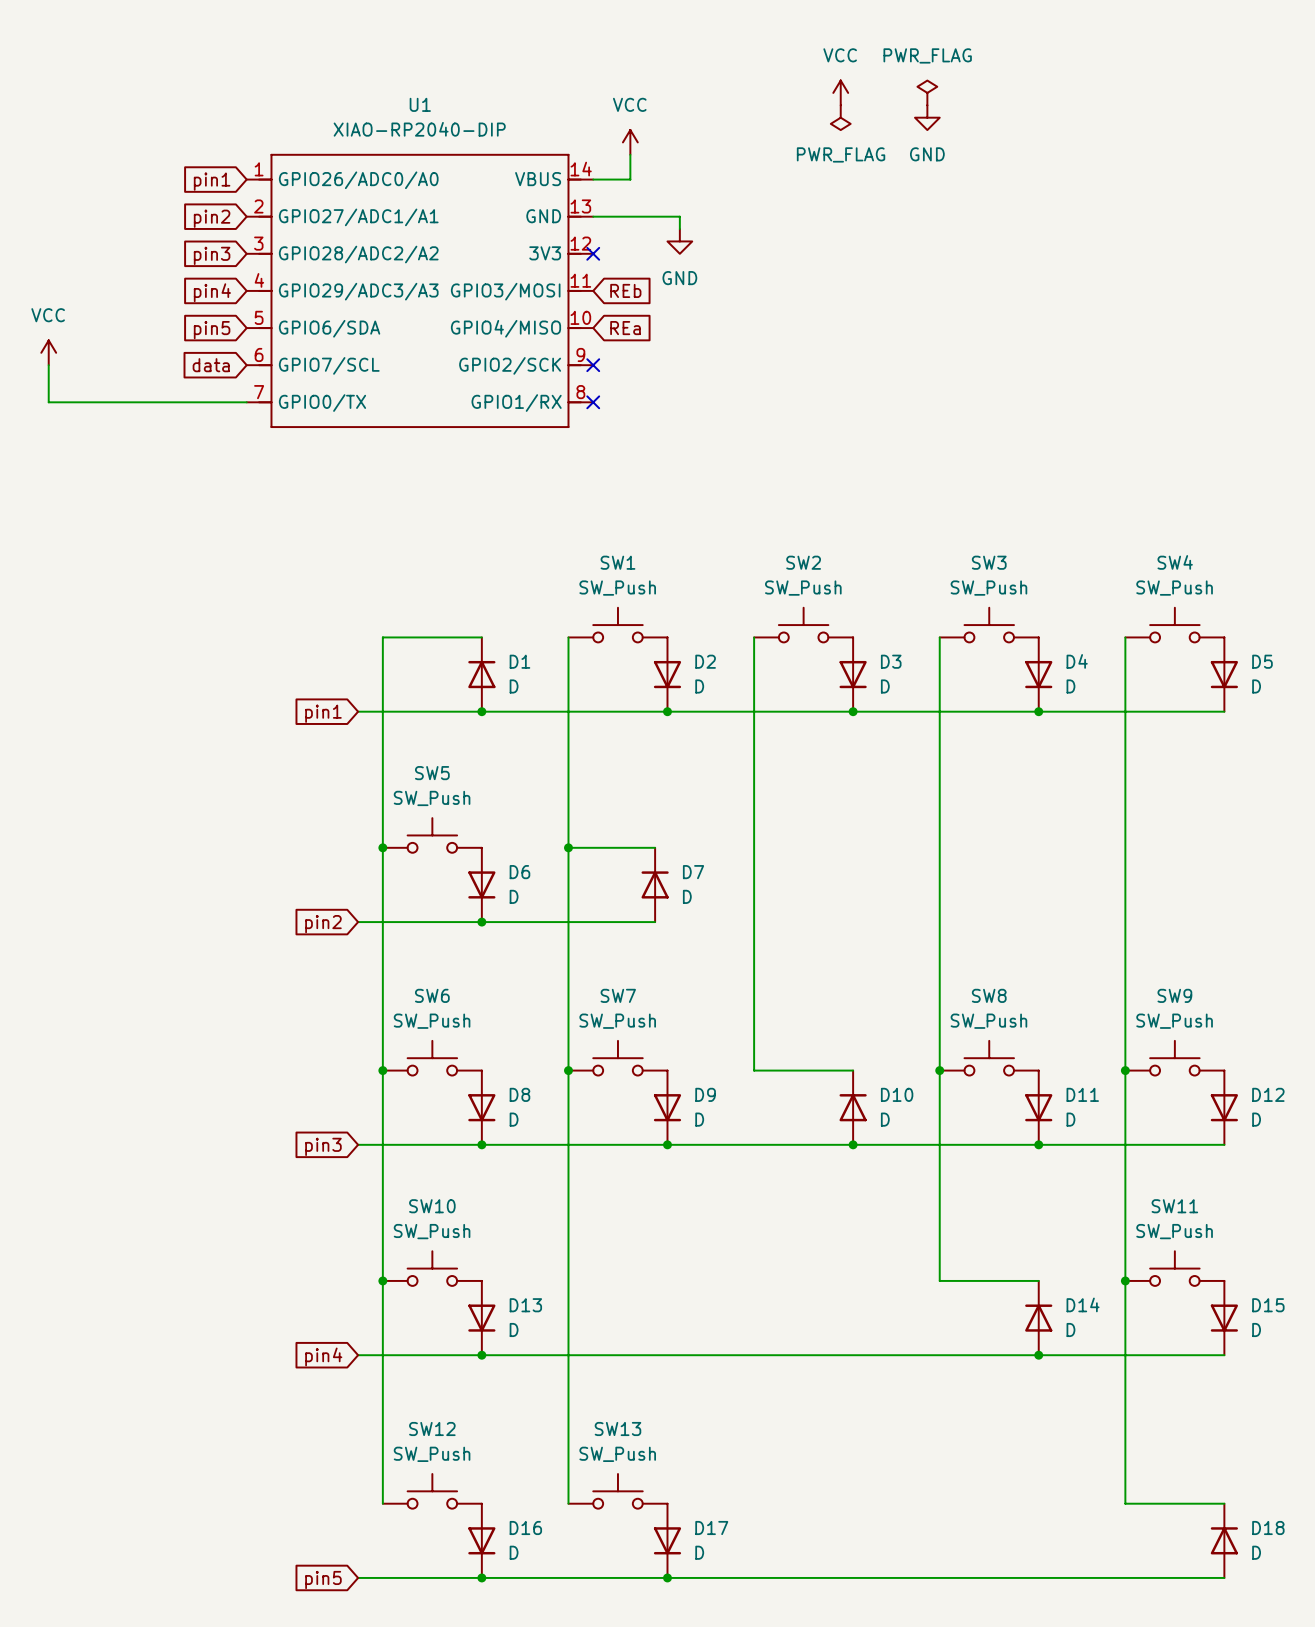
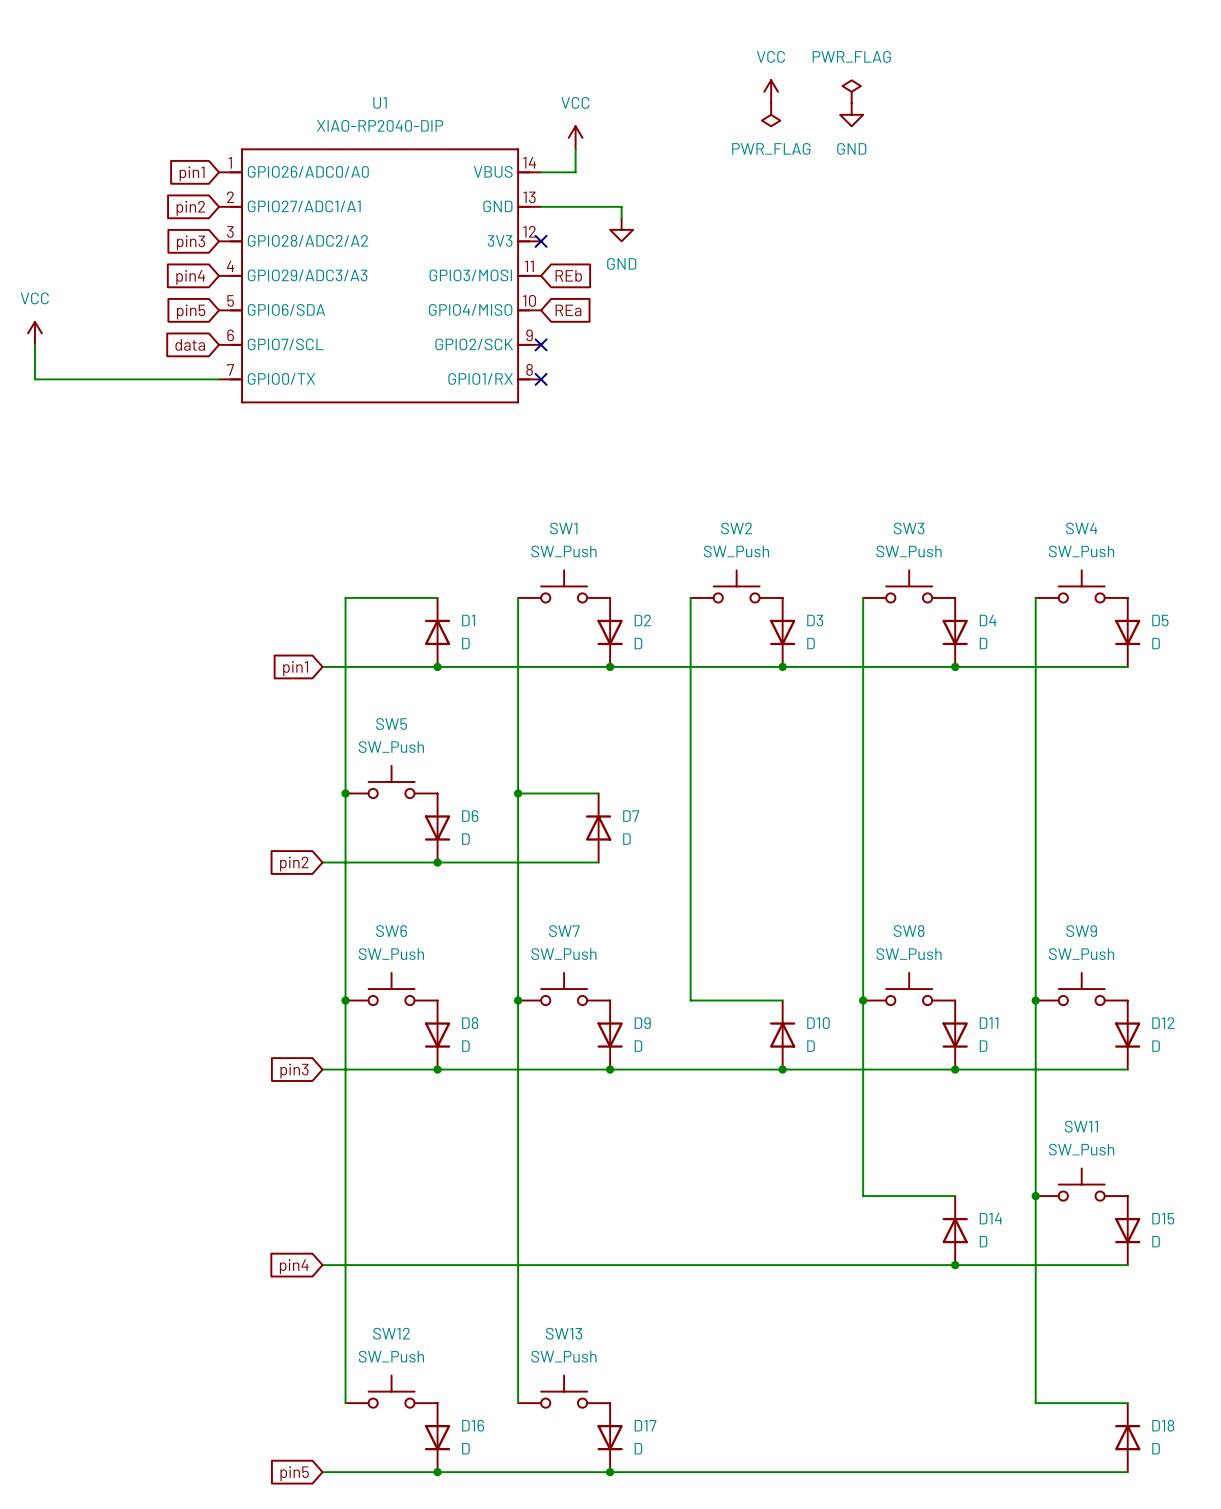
SW10: SW_Push (432, 1268) -> none
junction: (382, 1280) -> none
D13: D (481, 1318) -> none
junction: (481, 1355) -> none

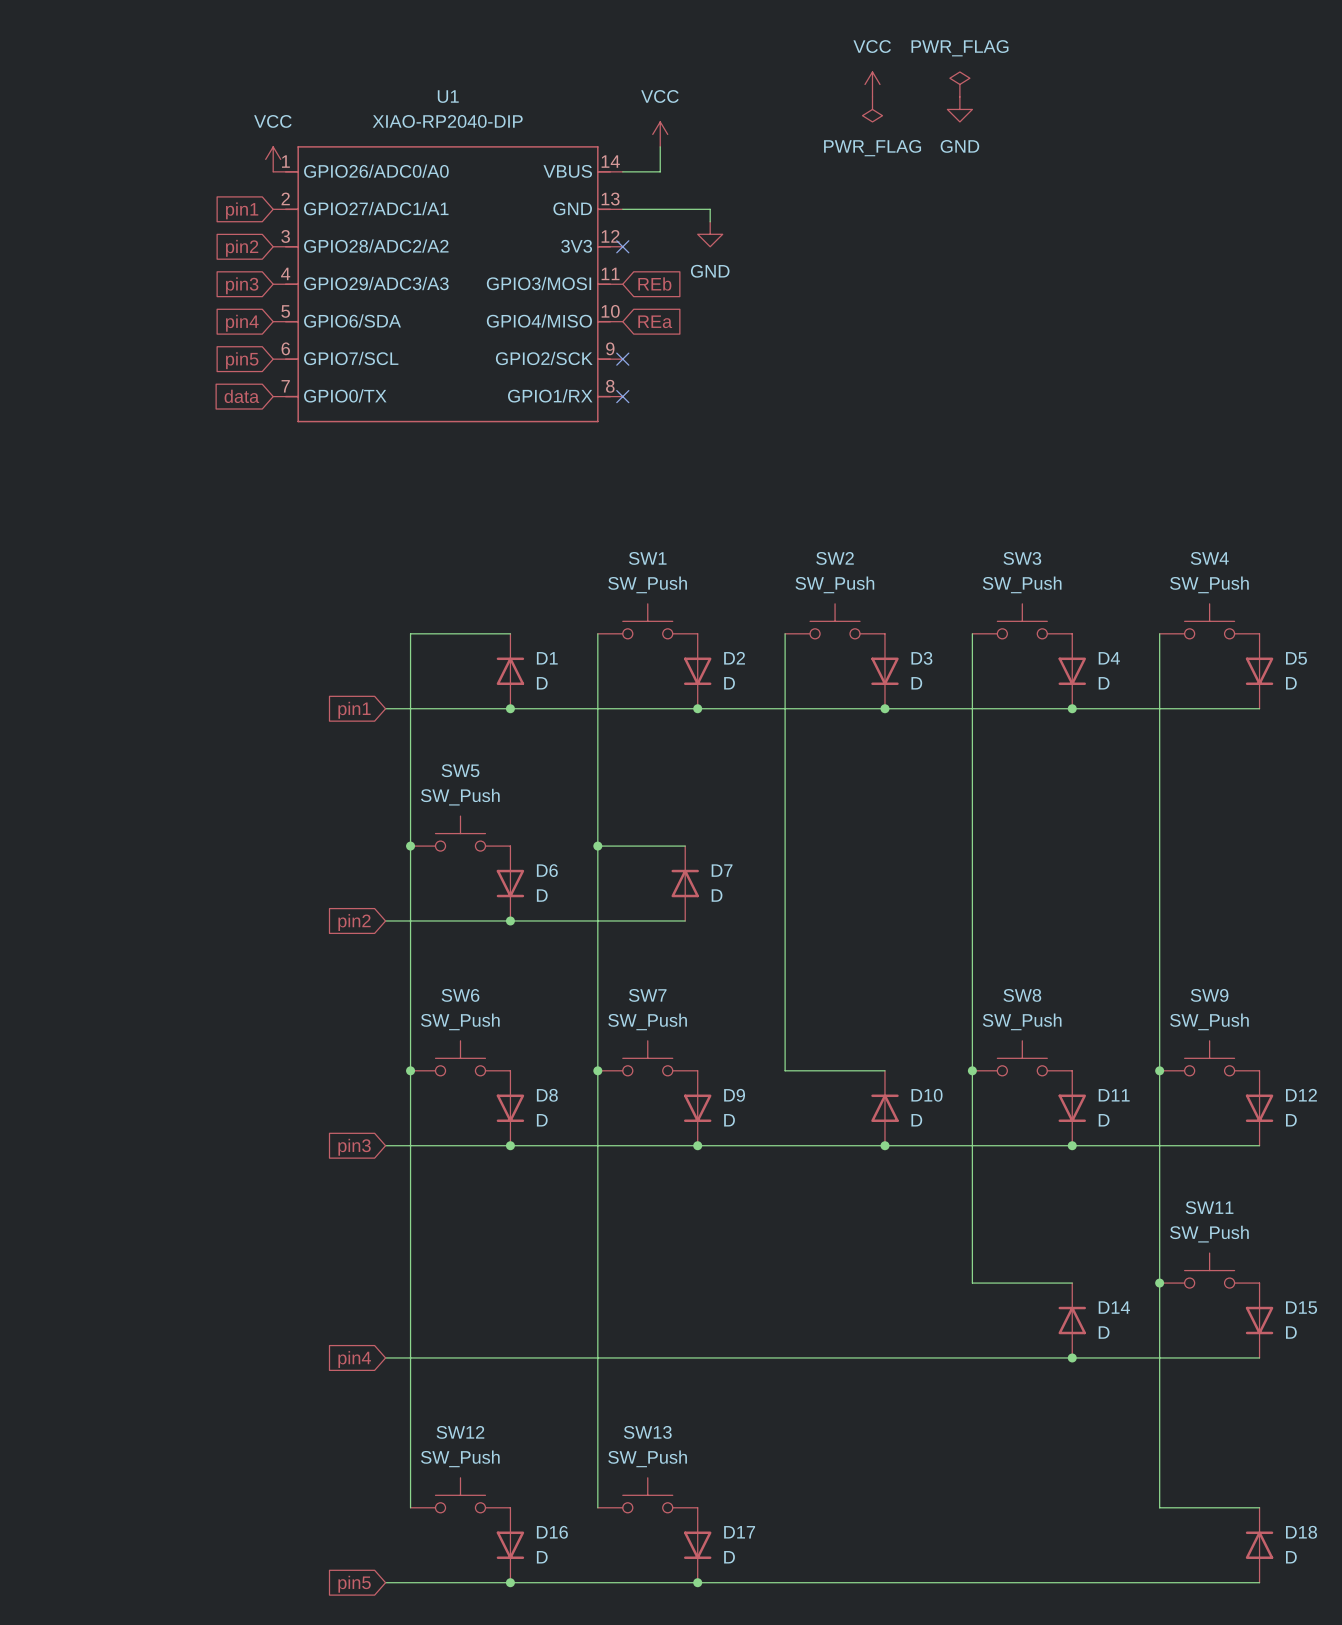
power symbol: none -> VCC (273, 159)
global label: pin1 (192, 173) -> none
global label: pin2 (190, 208) -> pin1 (242, 210)
global label: pin3 (190, 242) -> pin2 (242, 248)
global label: pin4 (190, 277) -> pin3 (242, 285)
global label: pin5 (191, 311) -> pin4 (242, 323)
power symbol: VCC (34, 333) -> none
wire: (34, 344) (34, 379) (219, 379) -> none
global label: data (190, 344) -> pin5 (242, 360)
global label: none -> data (241, 396)

